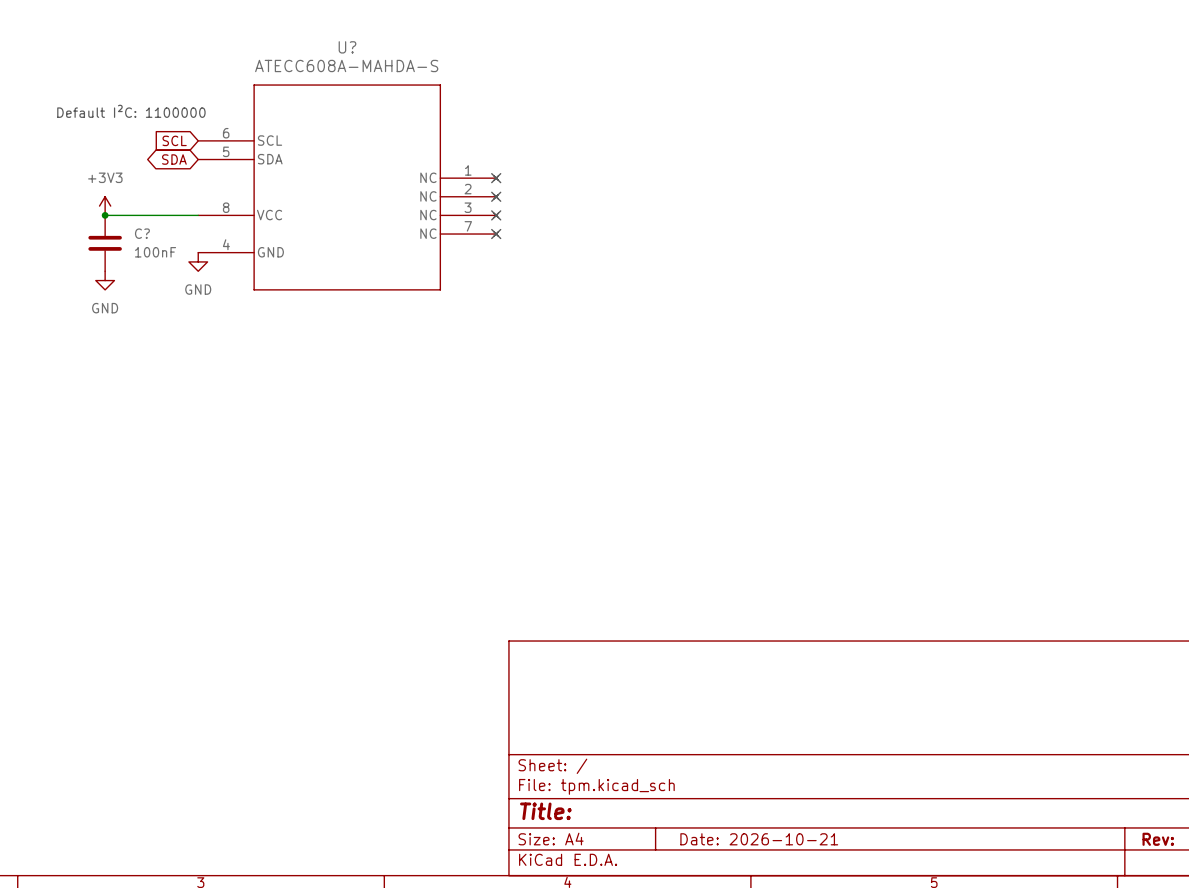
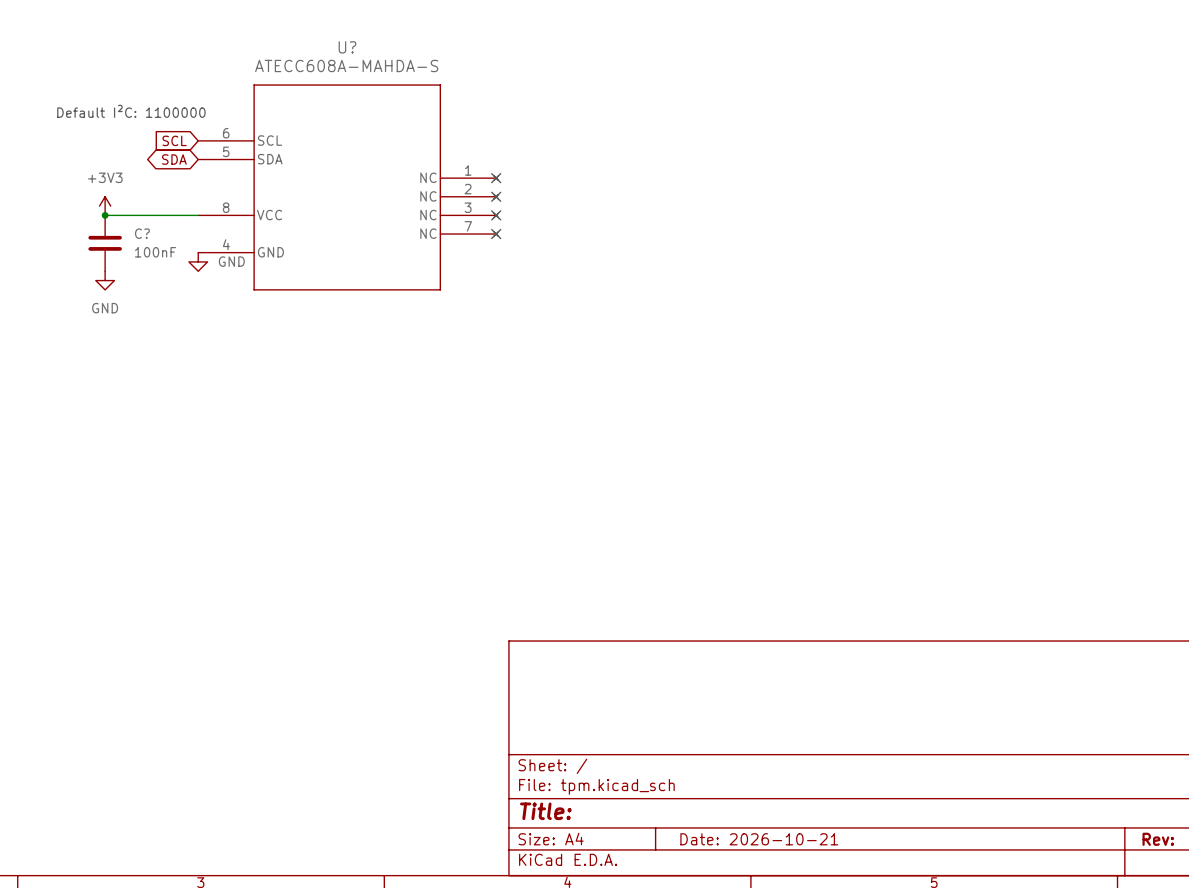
power symbol text position: GND (198, 289) -> GND (231, 261)

